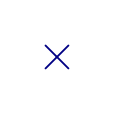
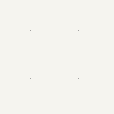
no-connect mark: (56, 56) -> none

